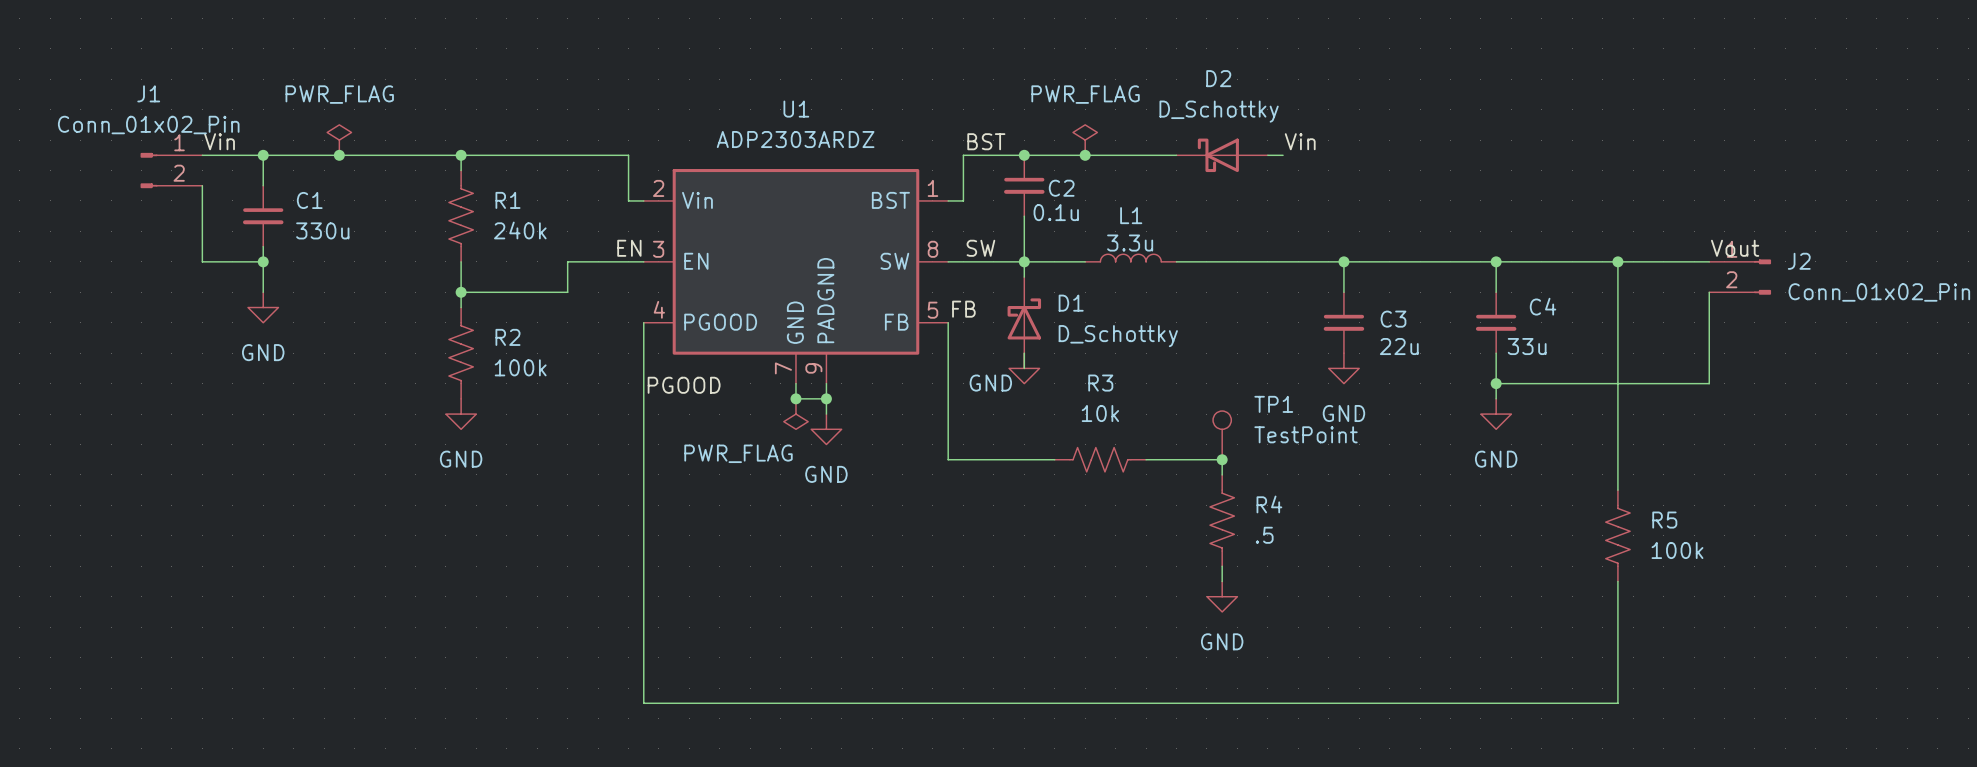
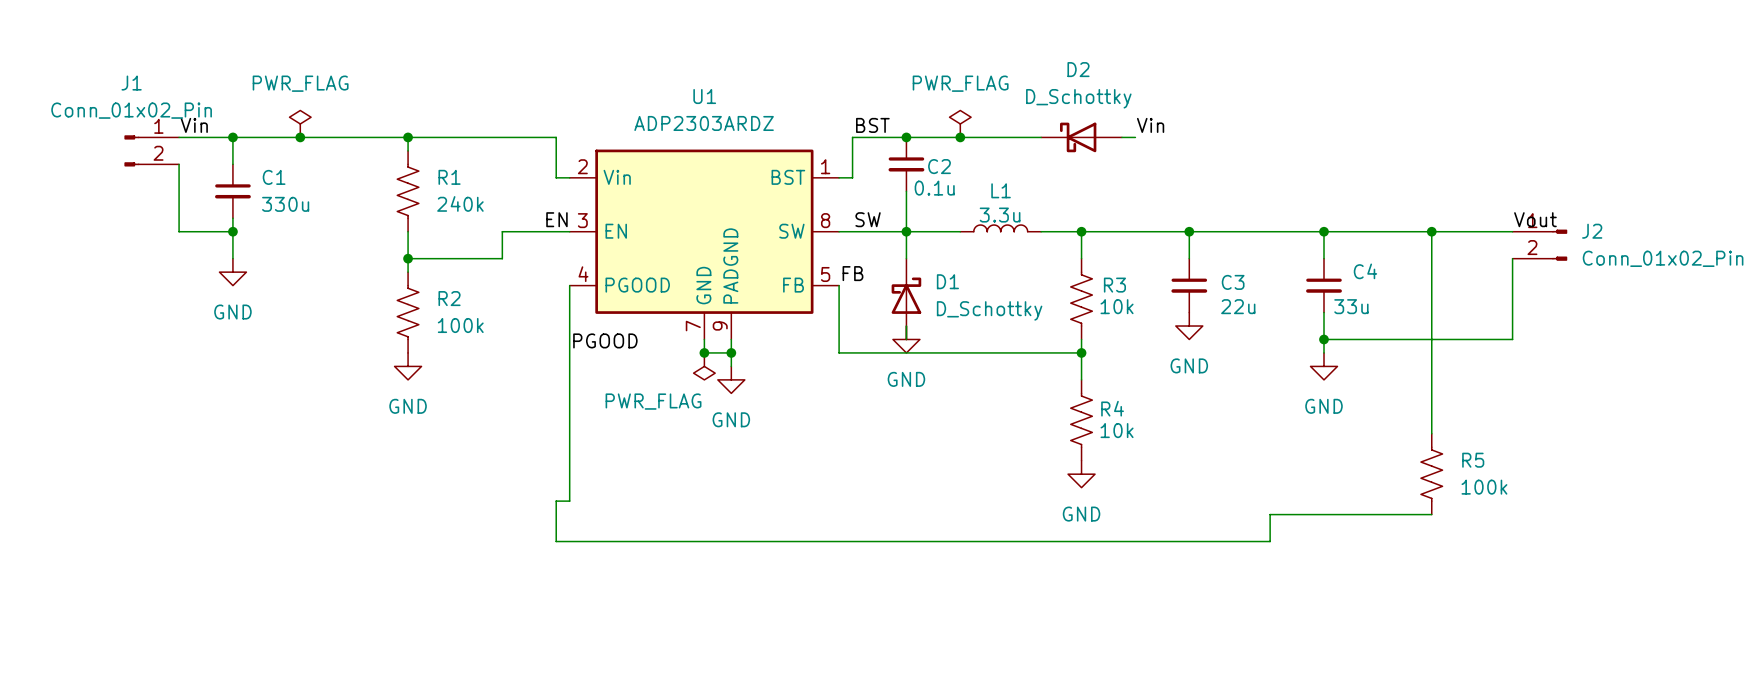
wire: none -> (1081, 231) (1081, 258)
junction: none -> (1081, 231)
D1 position: (1024, 322) -> (906, 299)
power symbol position: GND (1024, 368) -> GND (906, 339)
power symbol text position: GND (990, 383) -> GND (906, 379)
R3 name position: R3 (1100, 383) -> R3 (1114, 285)
wire: none -> (1081, 339) (1081, 379)
wire: (948, 398) (948, 459) (1054, 459) -> (839, 352) (1081, 352)
TP1: TestPoint (1222, 435) -> none
R3 rotation: 0° (1100, 459) -> 90° clockwise (1081, 299)
R3 position: (1100, 459) -> (1081, 299)
wire: (1146, 459) (1222, 459) (1222, 474) -> none
junction position: (1222, 459) -> (1081, 352)
R4 name position: R4 (1269, 504) -> R4 (1112, 408)
R4 position: (1222, 520) -> (1081, 420)
R4 value: .5 (1264, 535) -> 10k (1117, 430)
wire: (643, 566) (643, 703) (1617, 703) (1617, 581) -> (569, 501) (556, 501) (556, 541) (1270, 541) (1270, 514) (1431, 514)
wire: (1222, 566) (1222, 581) -> none
power symbol position: GND (1222, 596) -> GND (1081, 474)

